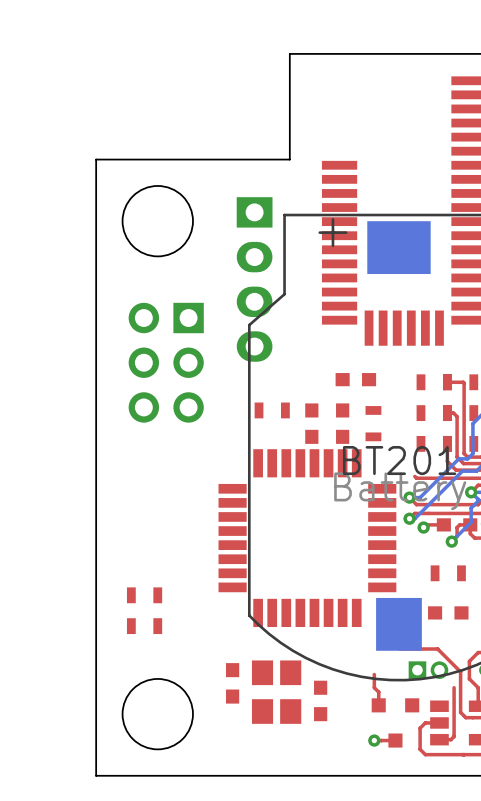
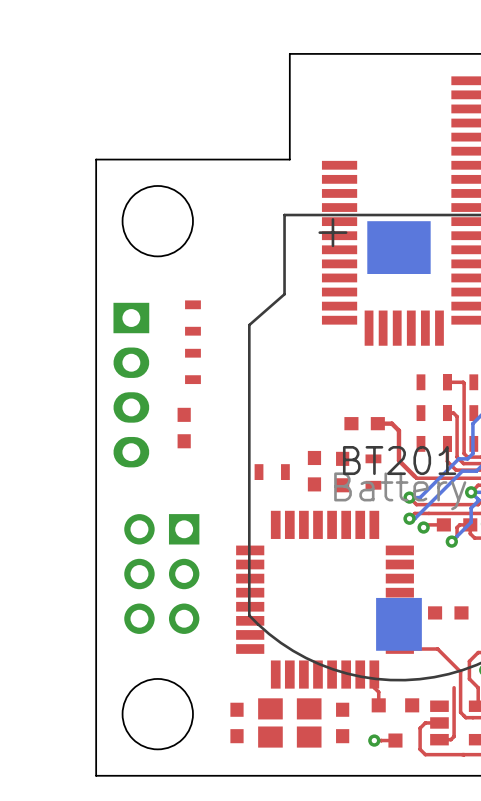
part position: (254, 279) -> (131, 385)
part: none -> (192, 318)
part position: (166, 362) -> (161, 574)
part: none -> (192, 366)
part: (355, 379) -> none
part footprint: [365, 406, 382, 442] -> [344, 417, 385, 431]
part: (272, 410) -> none
part: (311, 423) -> none
part: (342, 423) -> none
top track: none -> (377, 423) (391, 423) (398, 430) (398, 460) (414, 476)
part: none -> (184, 428)
part: none -> (314, 471)
part: none -> (272, 472)
part: none -> (342, 472)
part: none -> (373, 472)
part position: (307, 538) -> (325, 599)
part: (448, 573) -> none
part: (144, 595) -> none
part: (144, 626) -> none
part: (428, 670) -> none
part position: (232, 683) -> (237, 722)
part rotation: 0° (276, 692) -> 90° clockwise (289, 722)
part position: (320, 700) -> (342, 722)

